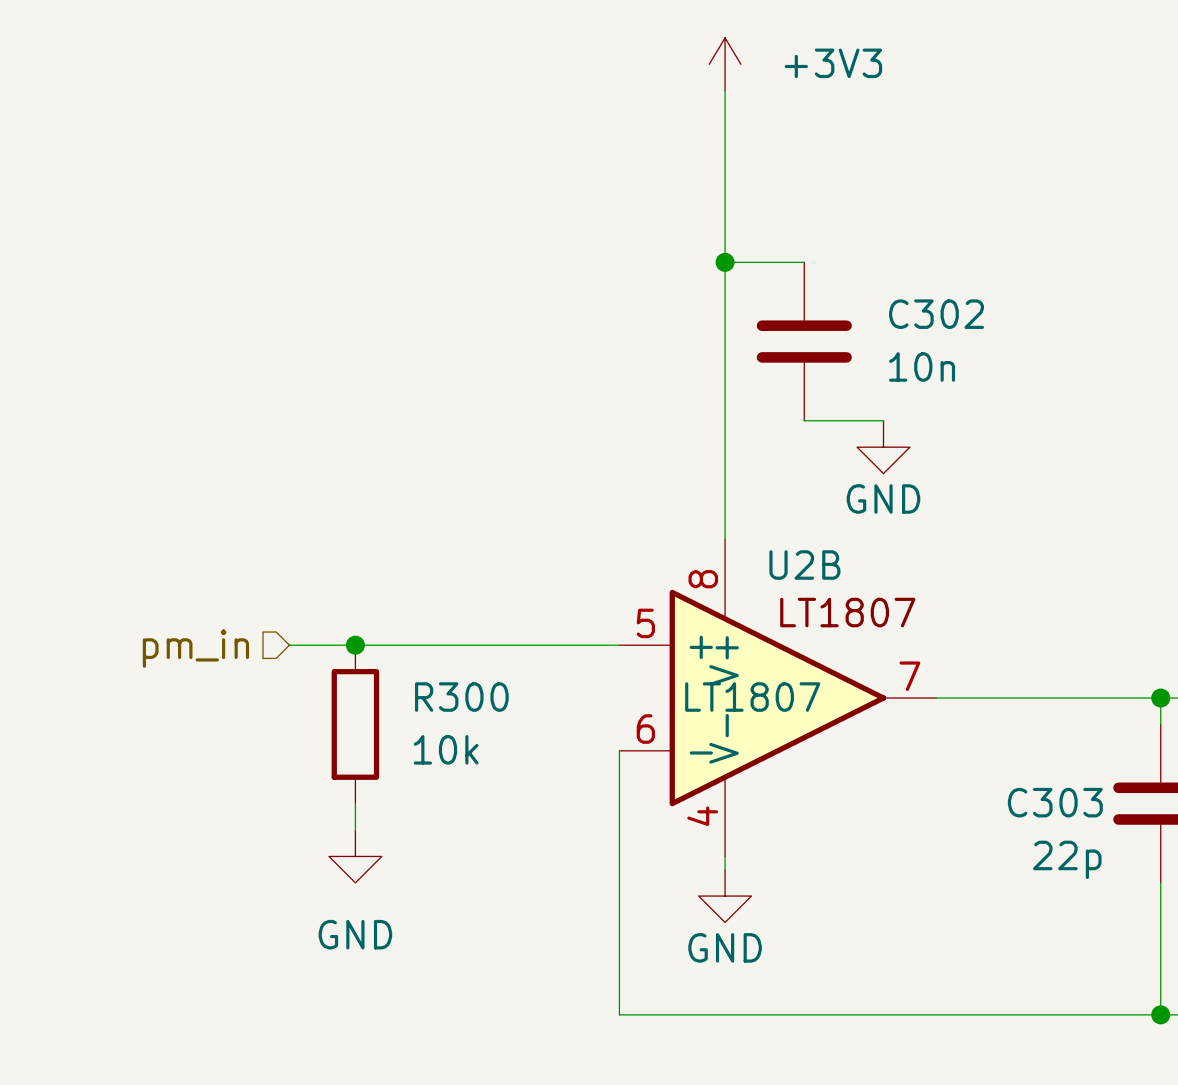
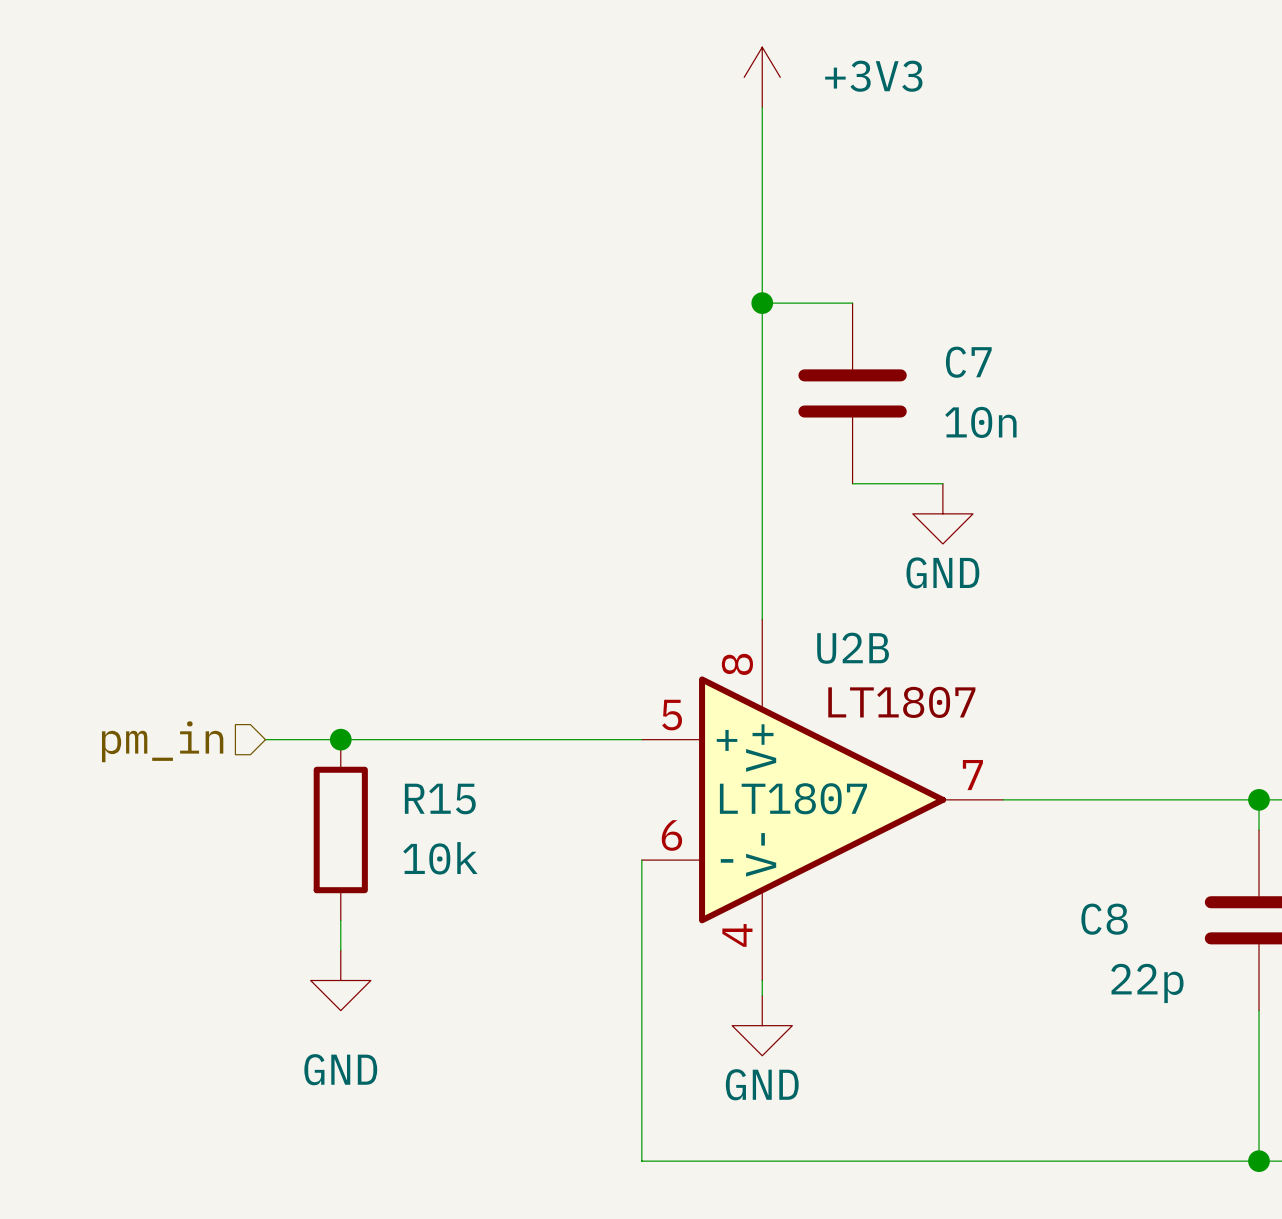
C302 name: C302 (936, 314) -> C7 (968, 362)
R300 name: R300 (461, 697) -> R15 (440, 799)
C303 name: C303 (1055, 802) -> C8 (1104, 919)

